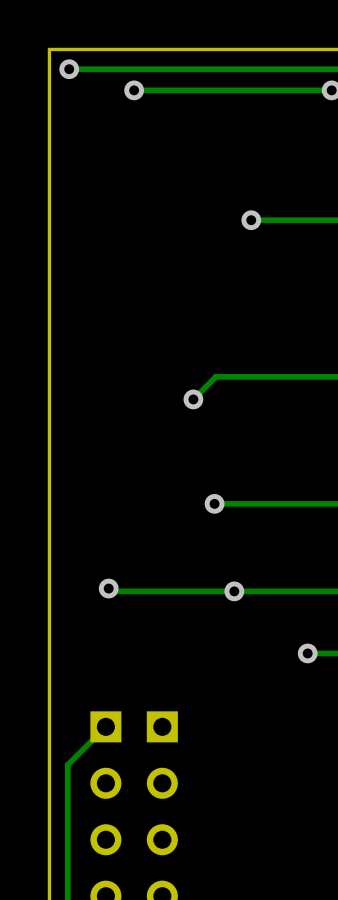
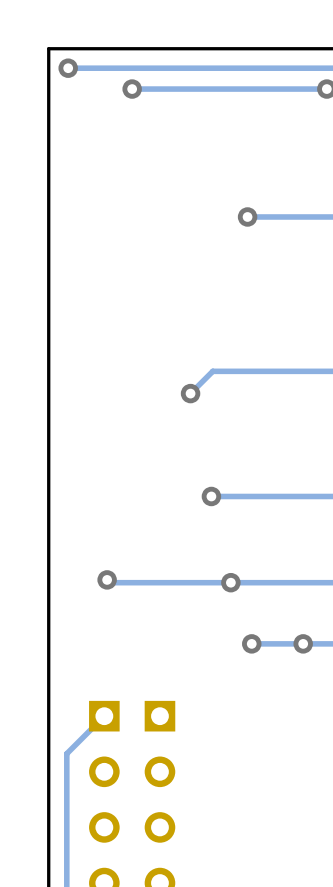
via: none -> (251, 643)
track: none -> (303, 643) (251, 643)

